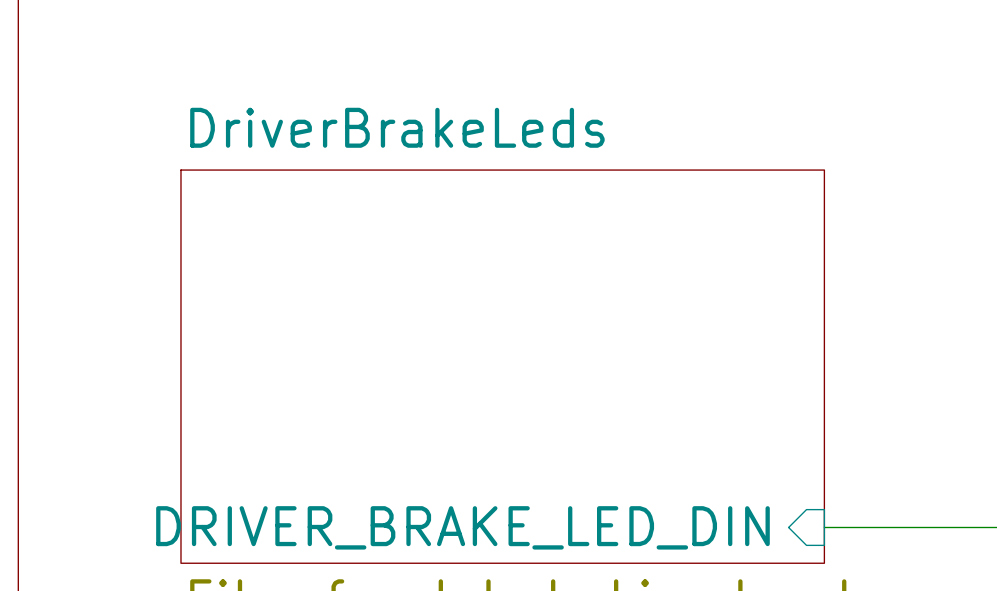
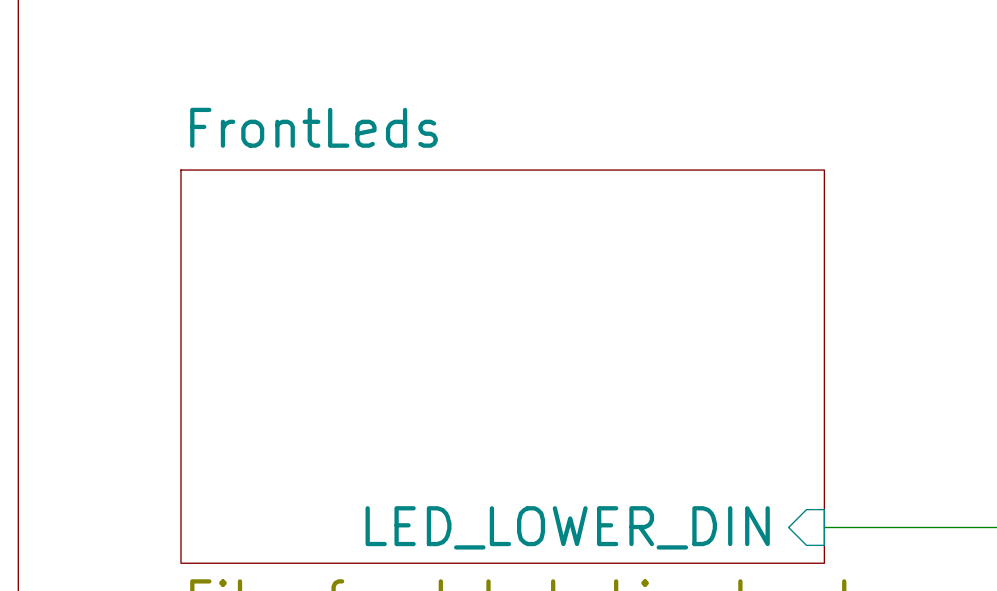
sheet DriverBrakeLeds name: DriverBrakeLeds (397, 127) -> FrontLeds (314, 127)
sheet pin: DRIVER_BRAKE_LED_DIN (462, 527) -> LED_LOWER_DIN (567, 527)

